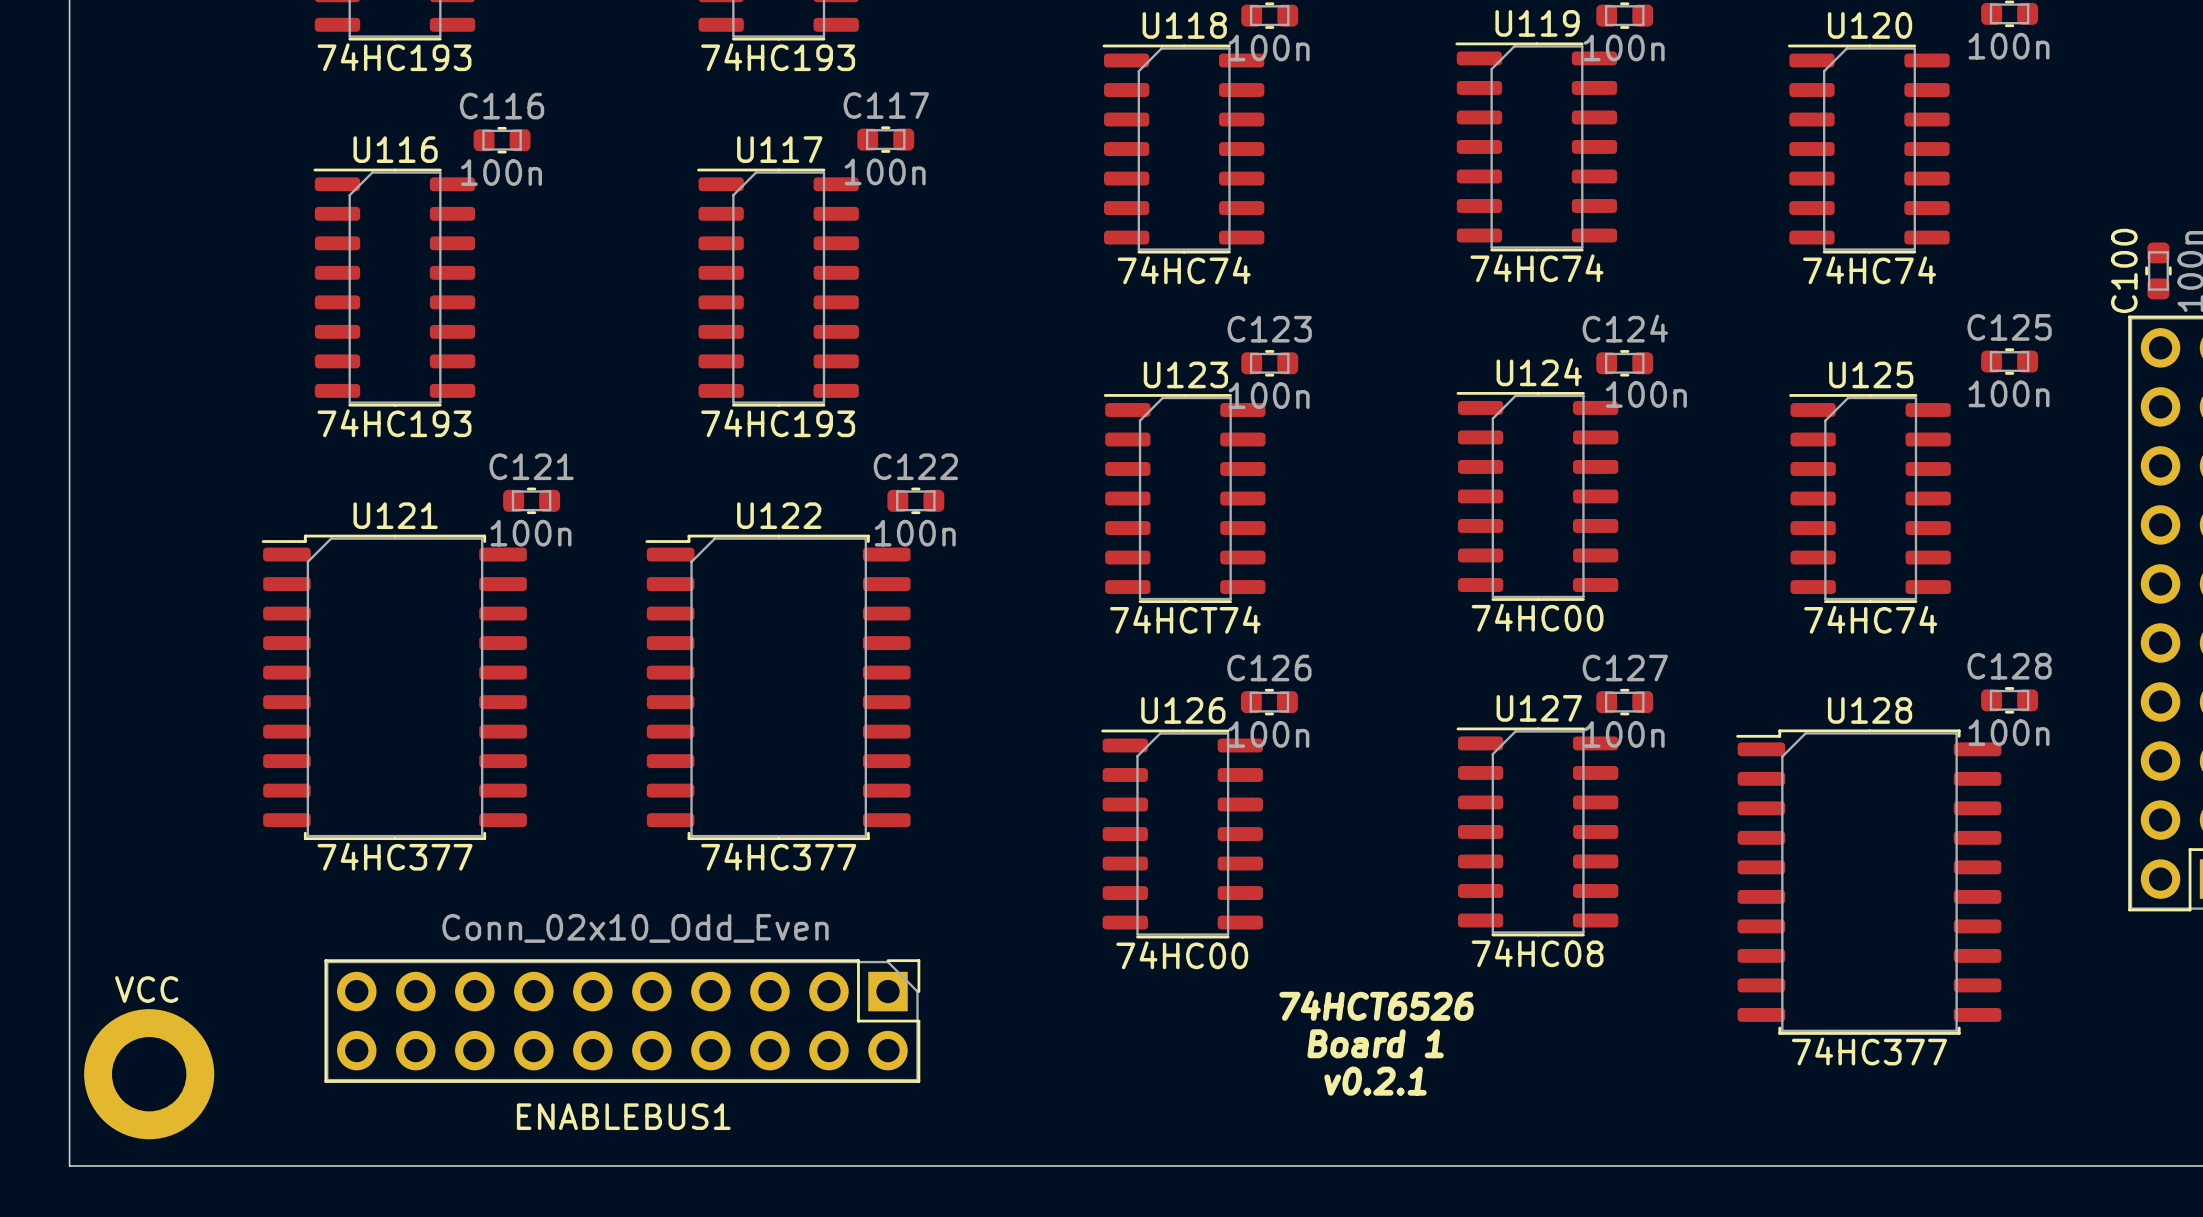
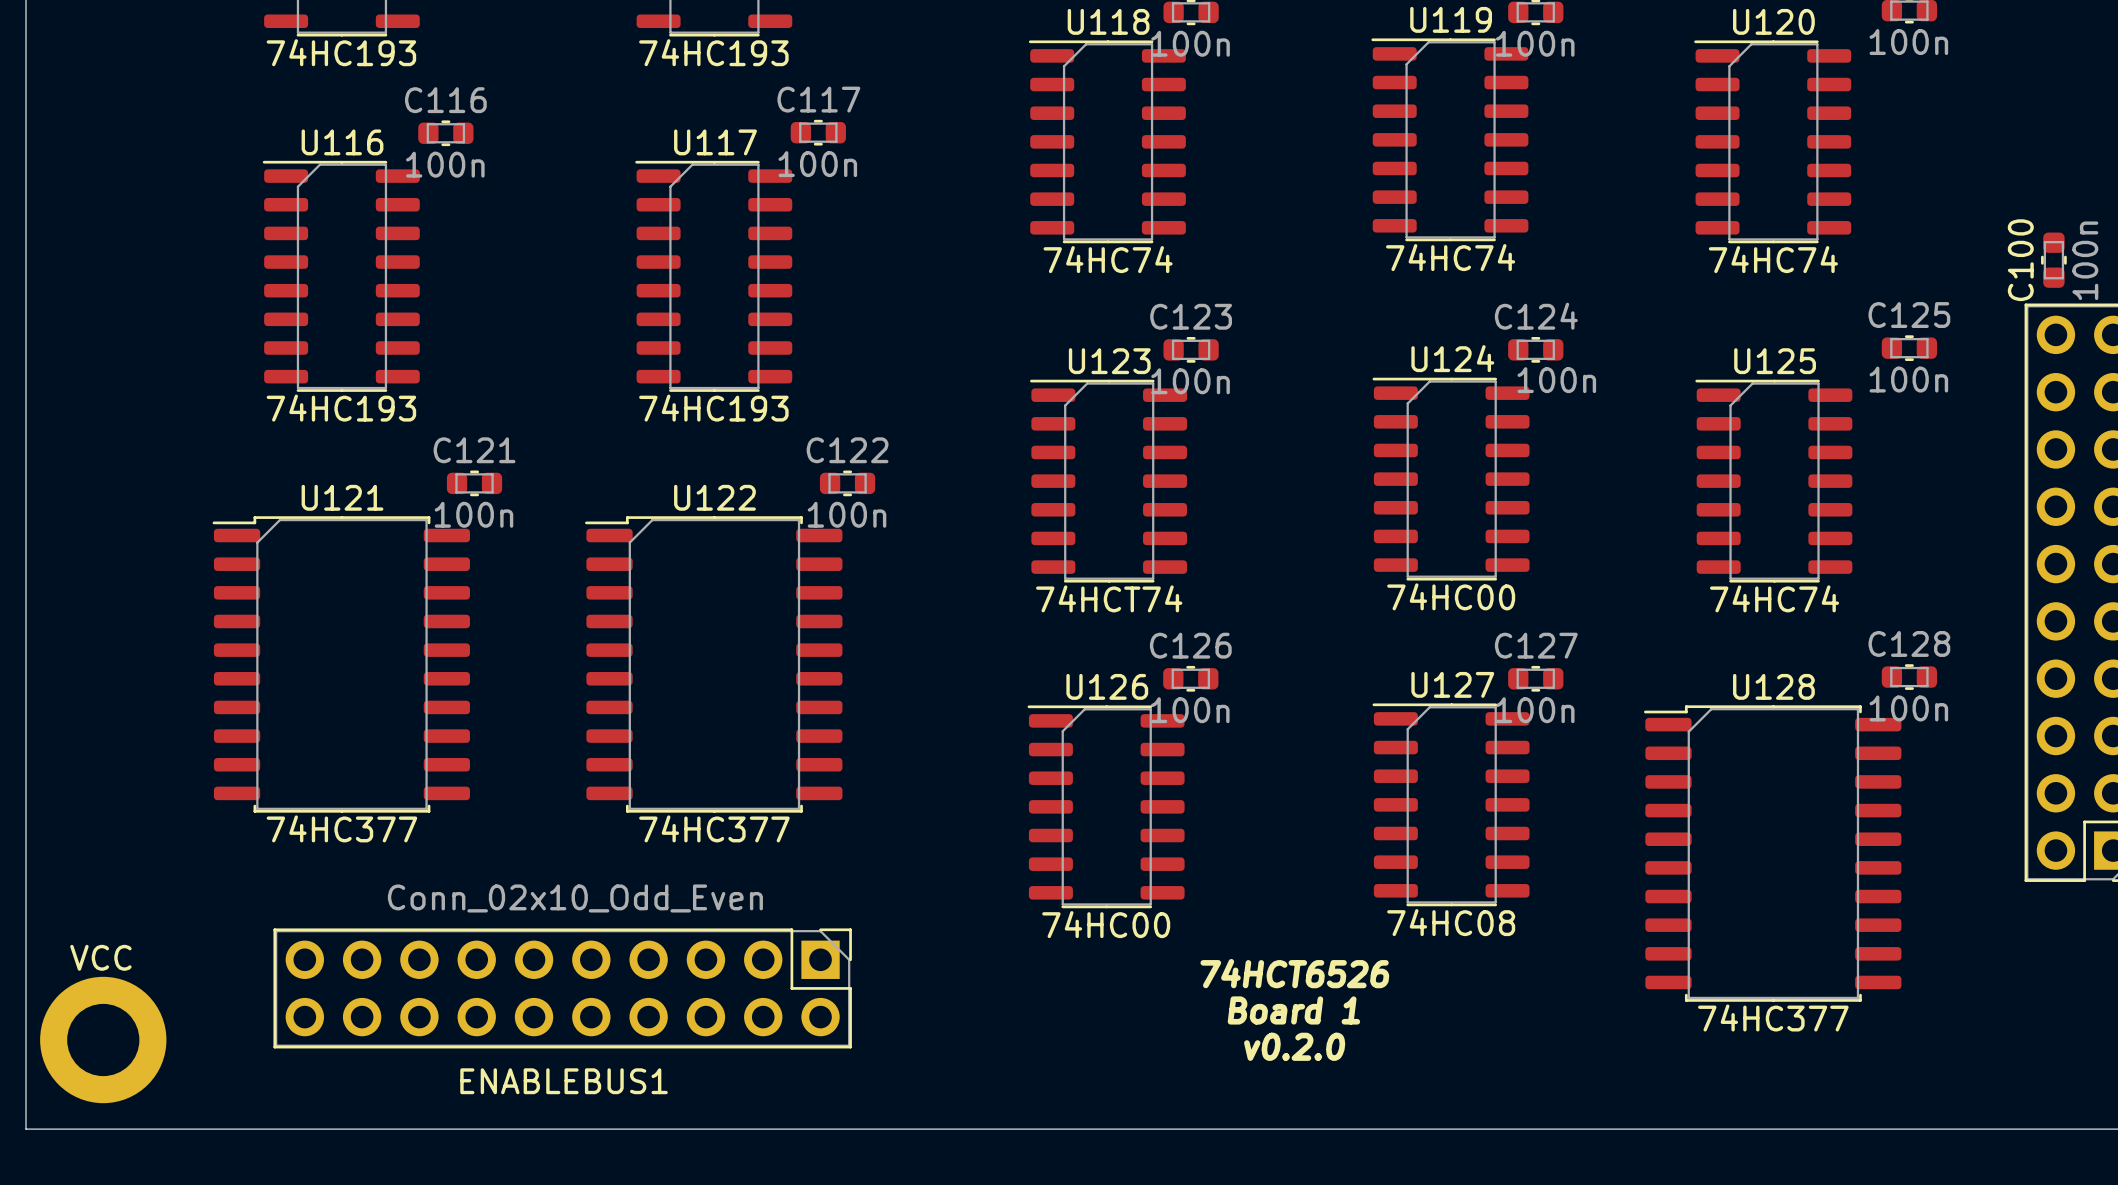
text: v0.2.1 (1375, 1081) -> v0.2.0 (1294, 1046)

